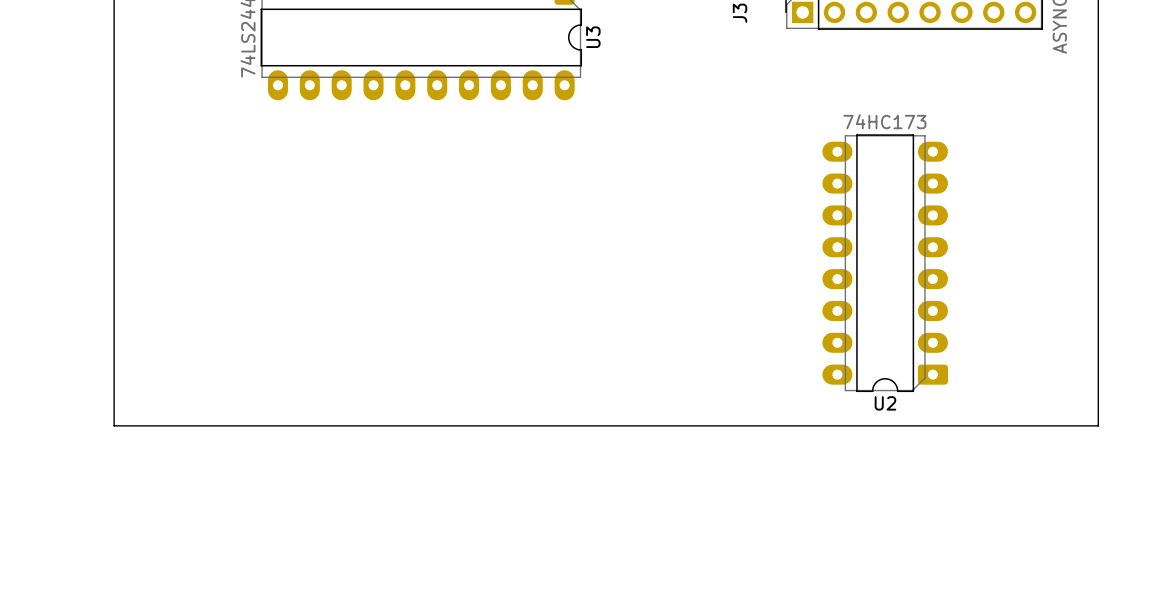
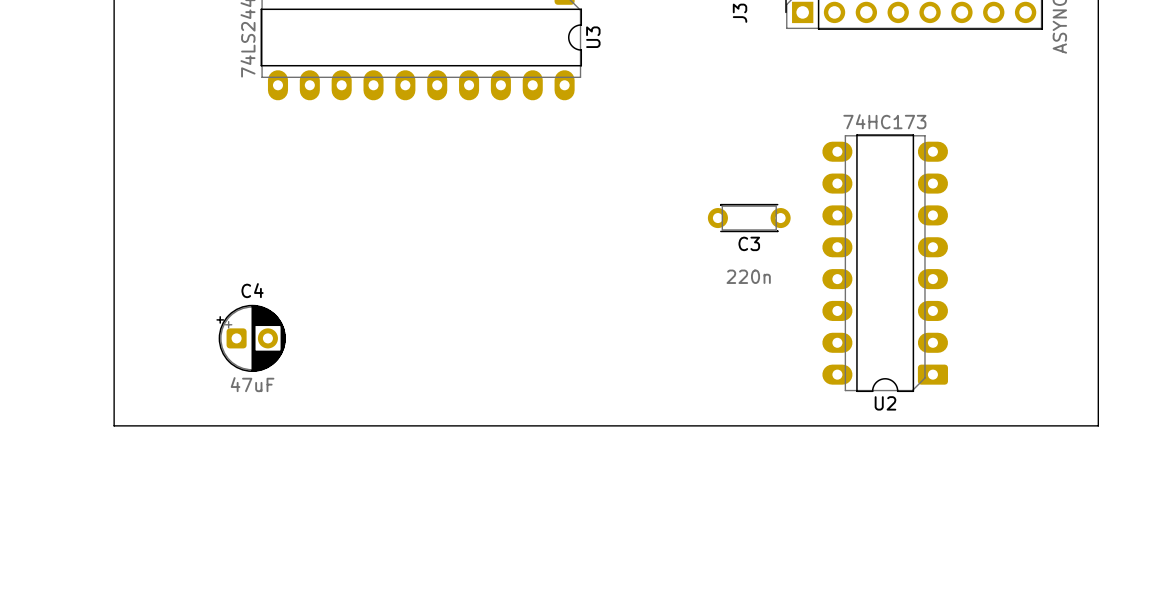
C3: none -> 220n (749, 218)
C4: none -> 47uF (251, 338)

